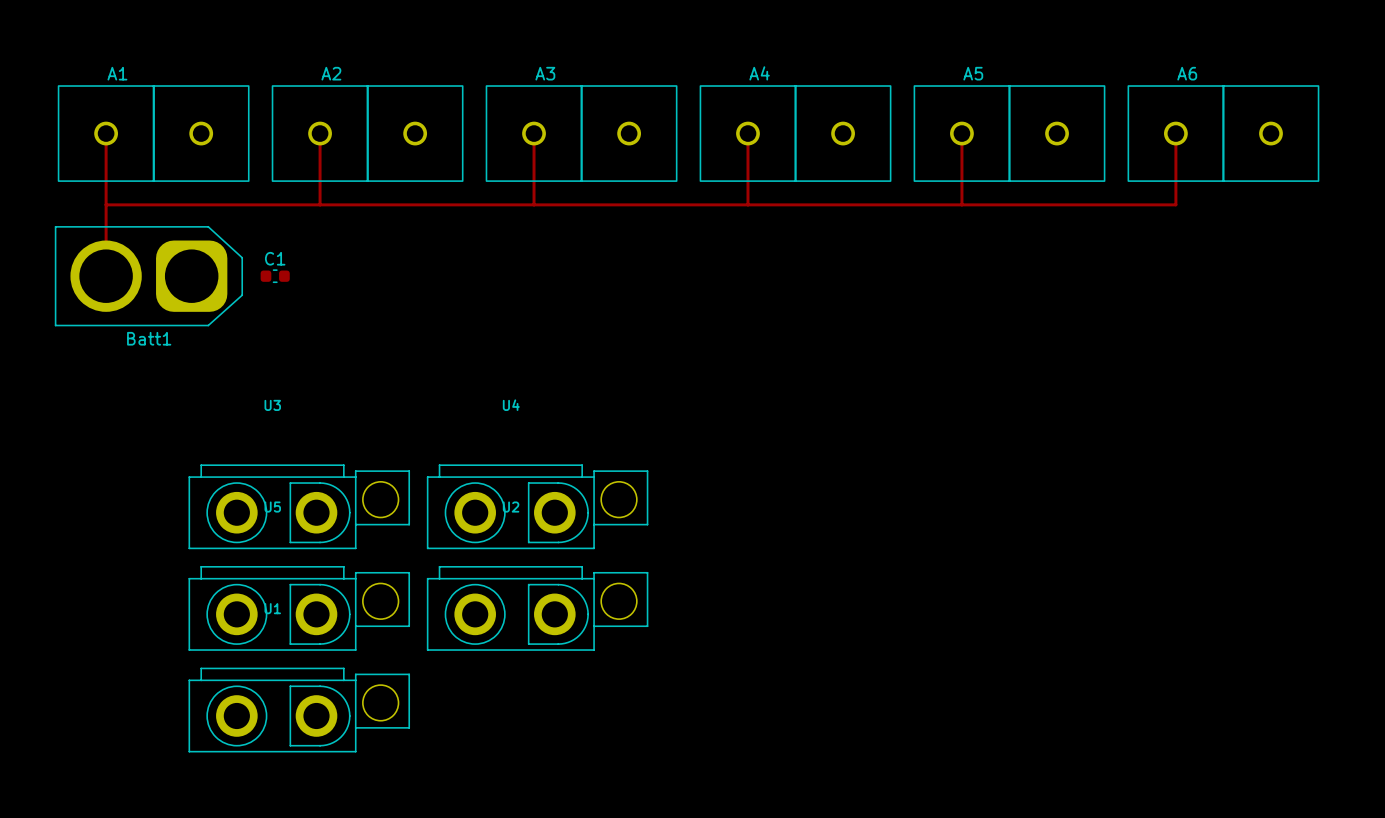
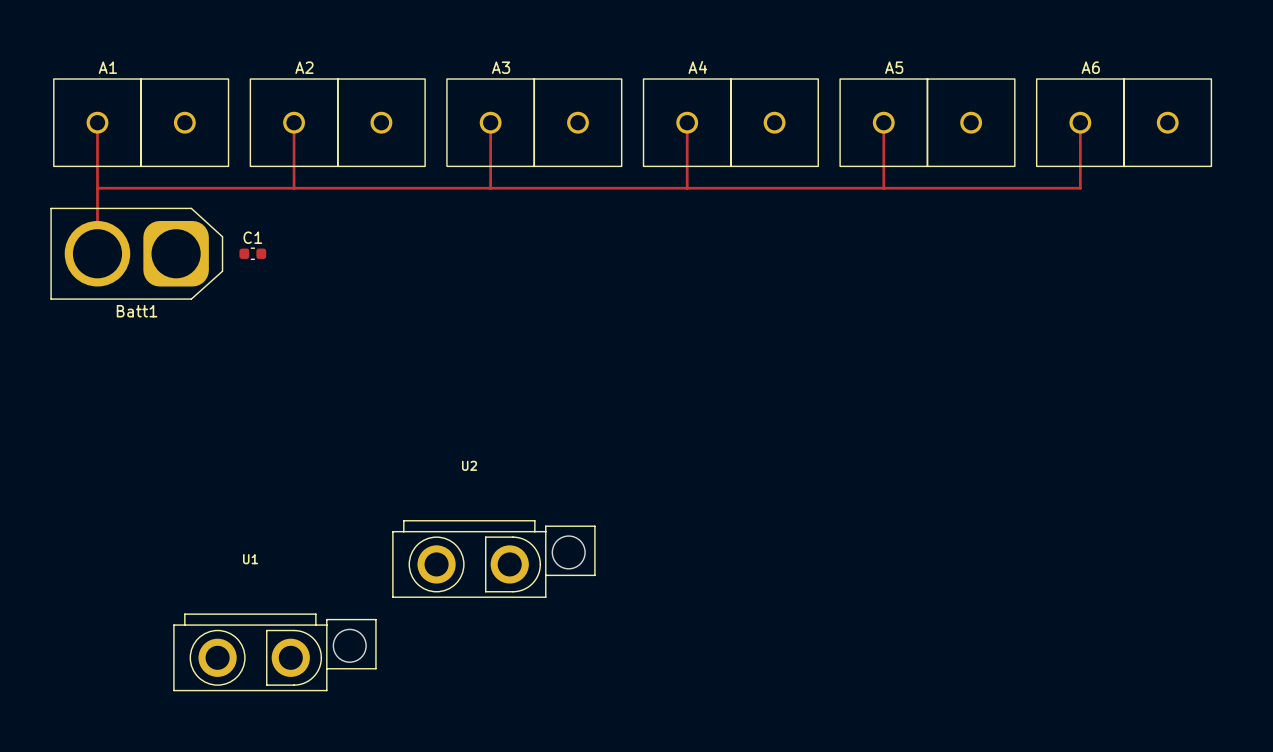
U3: (299, 506) -> none
U4: (537, 506) -> none
U5: (299, 608) -> none

